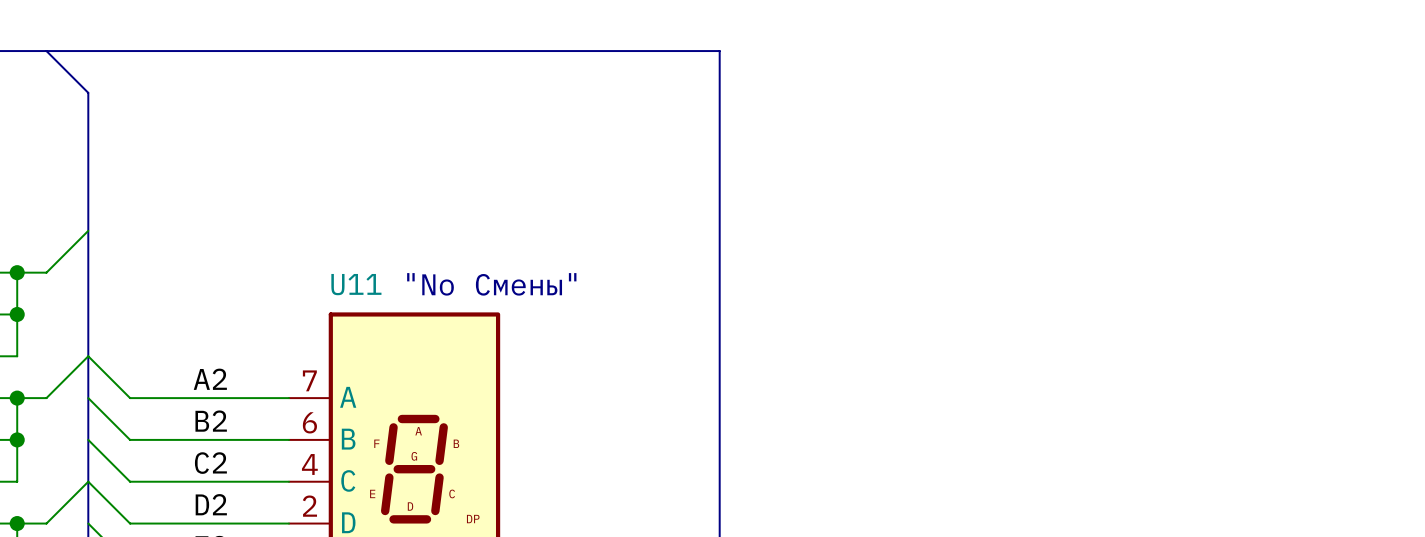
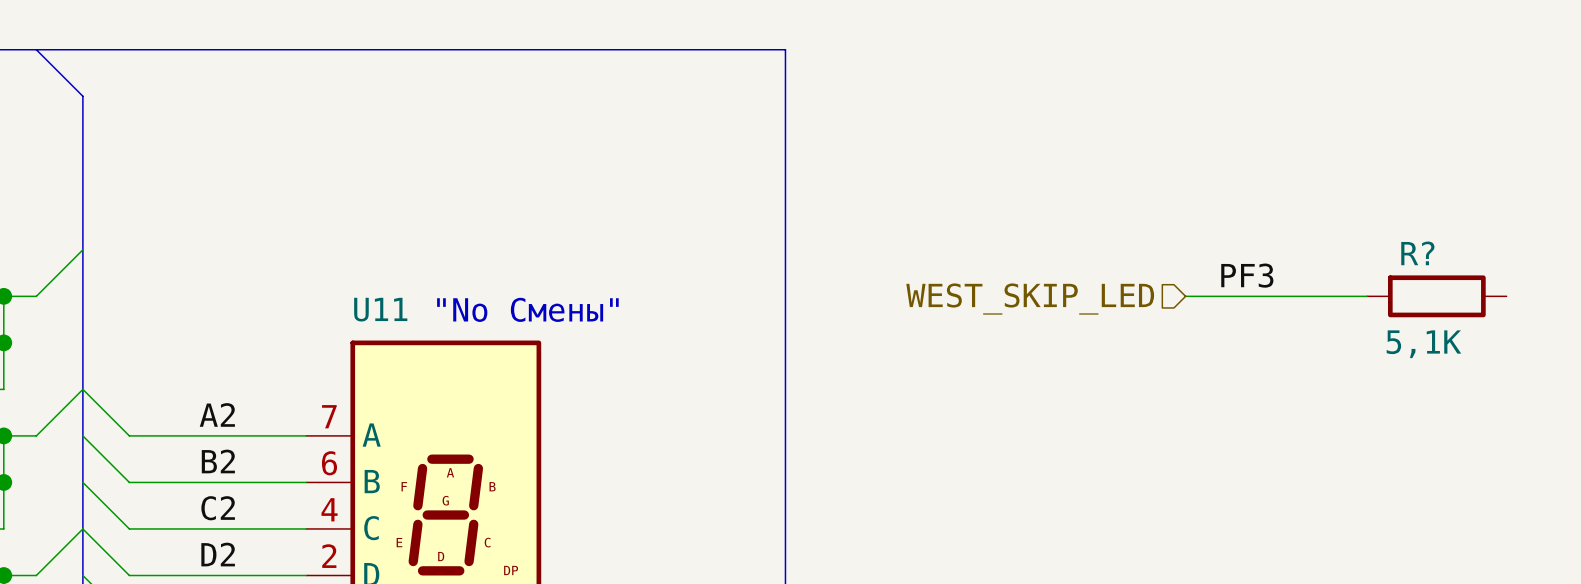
label: none -> PF3 (1247, 275)
wire: none -> (1185, 296) (1367, 296)
R?: none -> 5,1K (1436, 296)
hierarchical label: none -> WEST_SKIP_LED (1030, 299)

